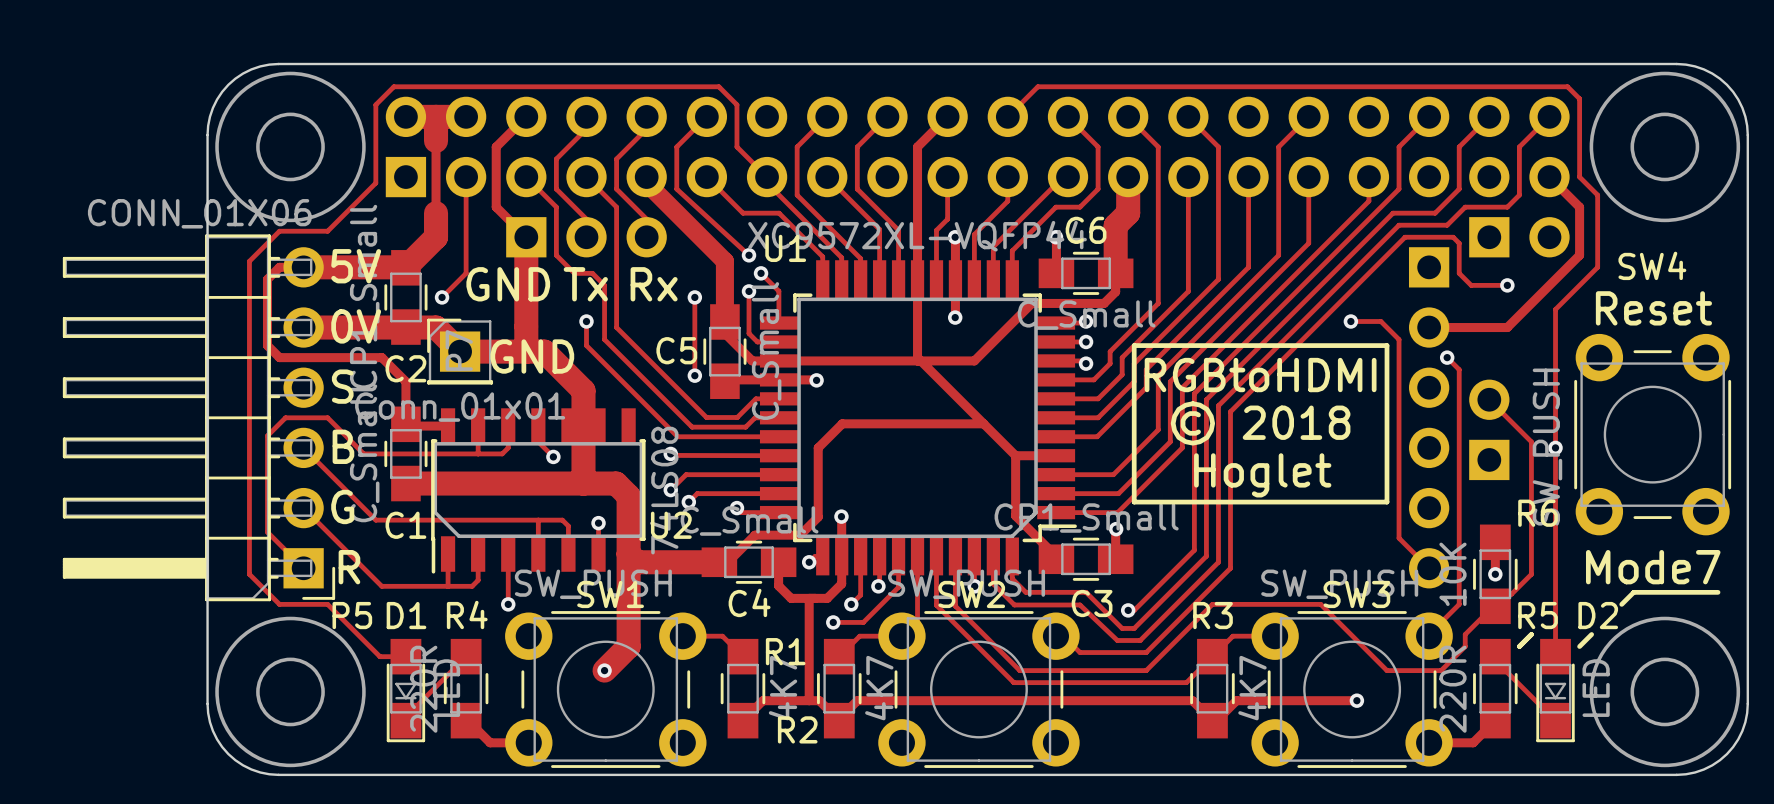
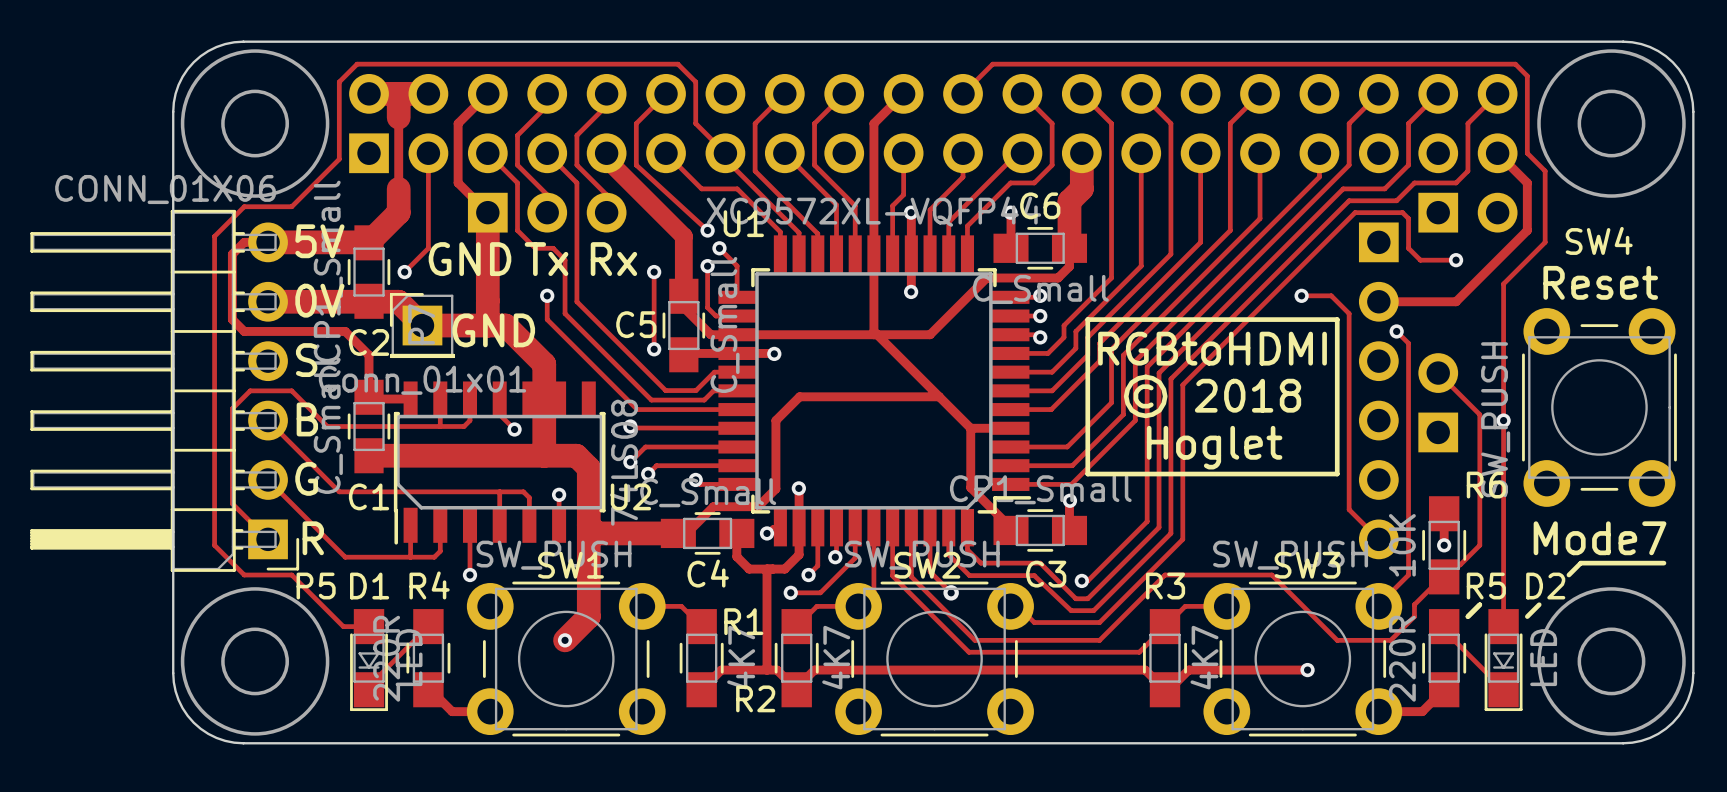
track: none -> (930, 556) (930, 571) (951, 592)
via: (974, 586) -> none
via: none -> (951, 592)

